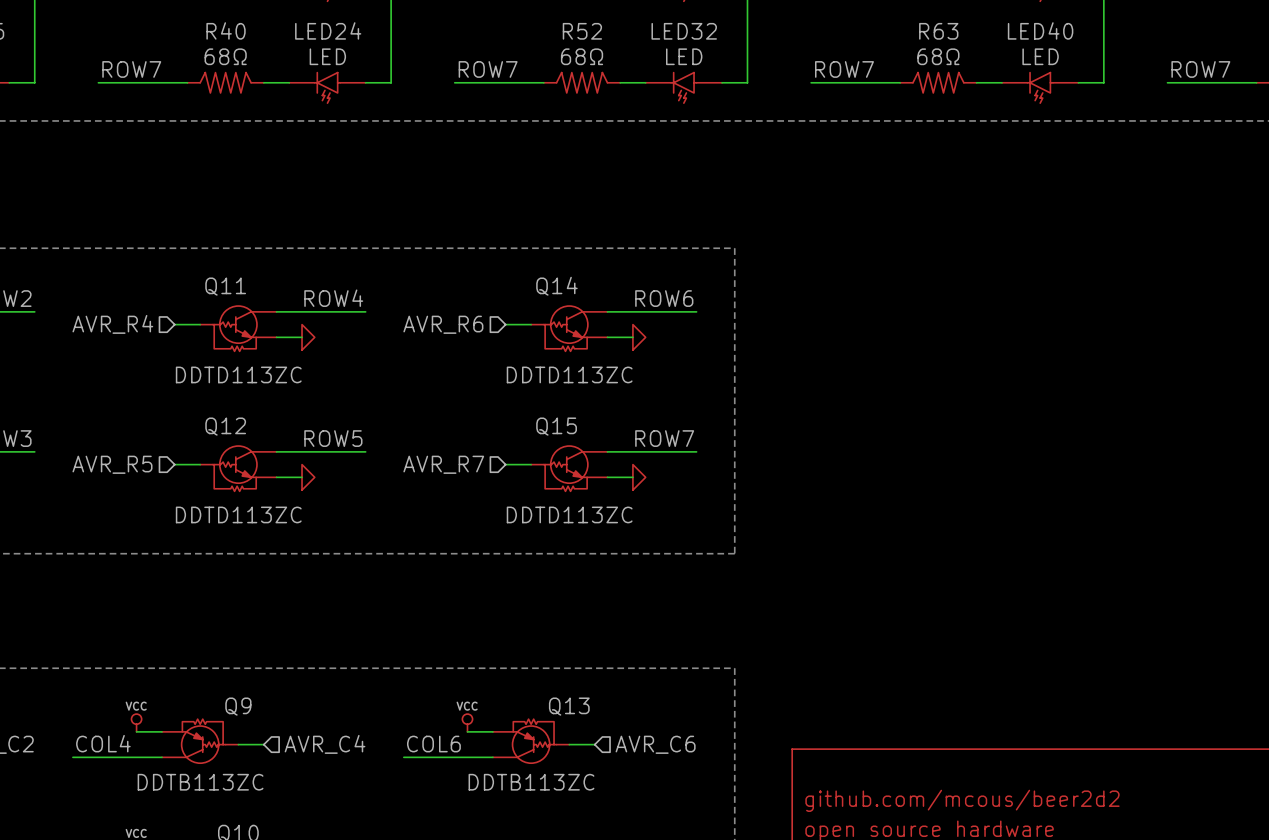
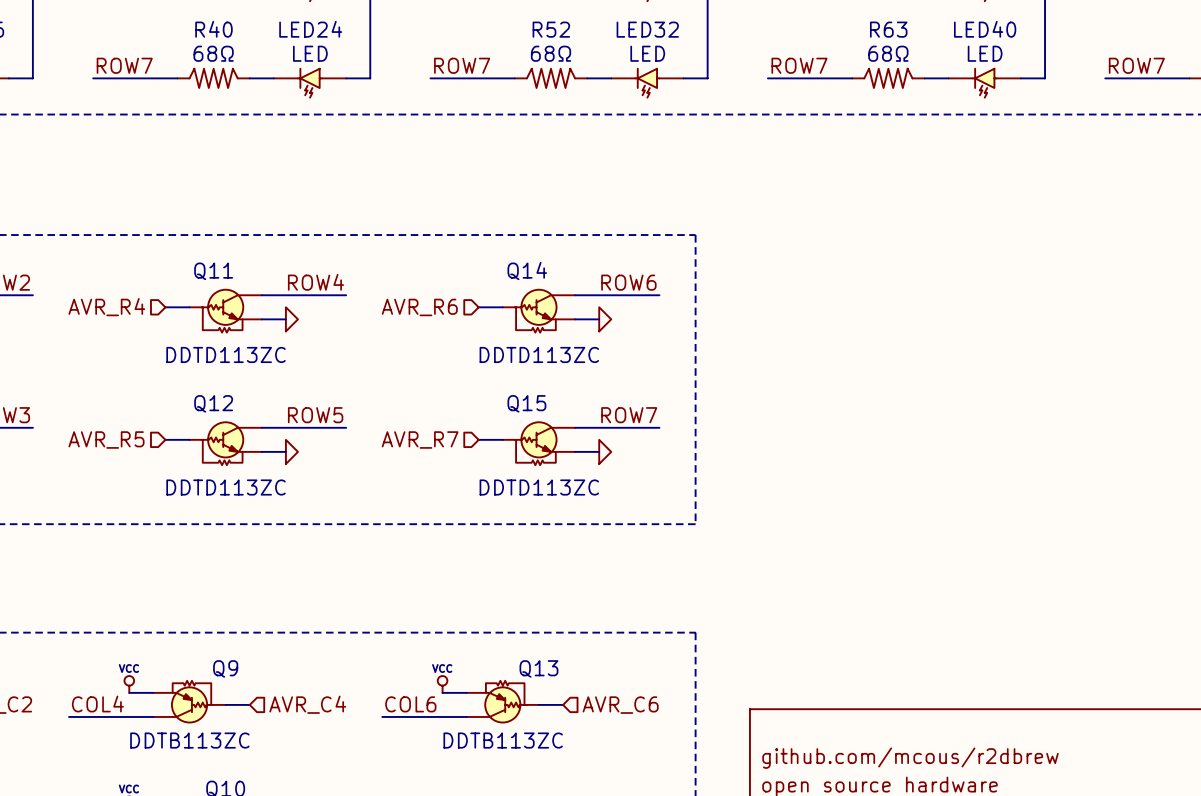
title block: github.com/mcous/beer2d2 (962, 800) -> github.com/mcous/r2dbrew (910, 758)

